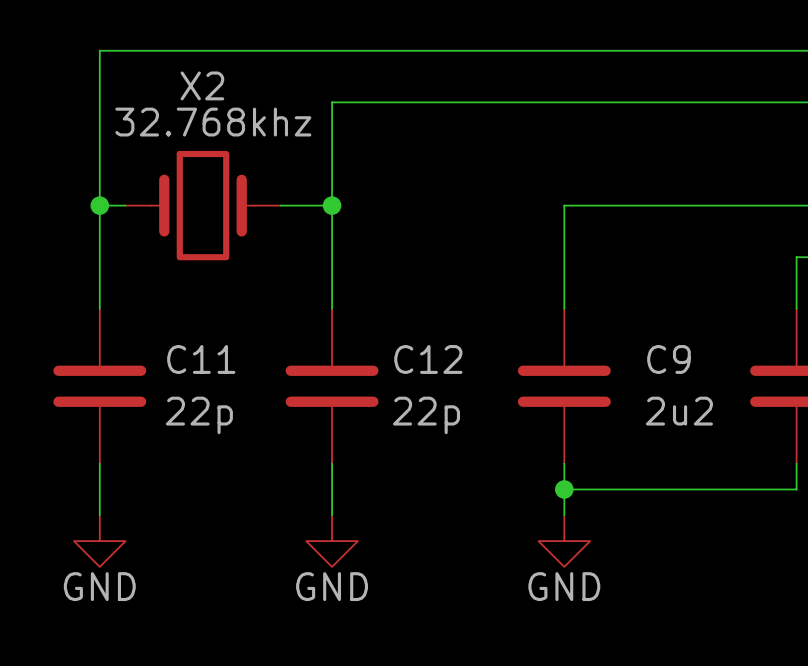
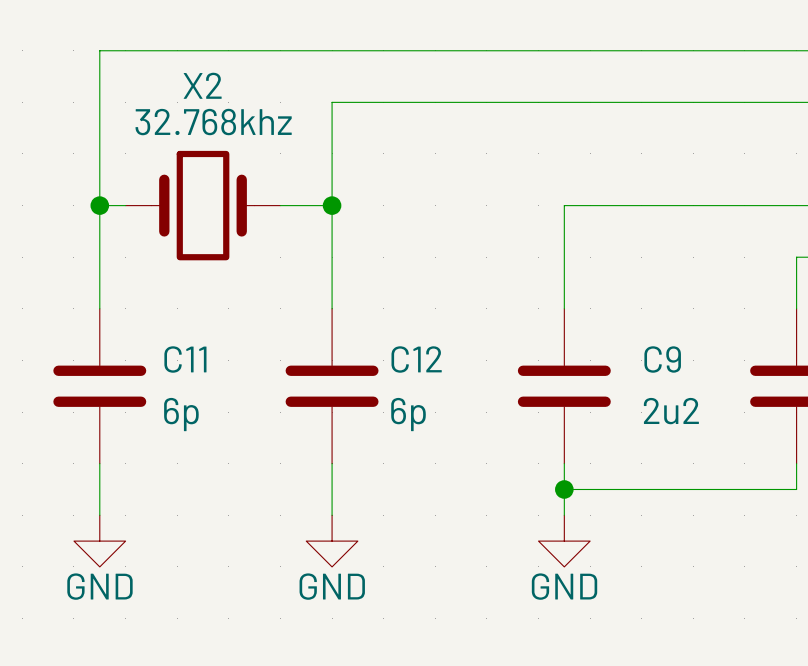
C11 value: 22p (199, 415) -> 6p (181, 414)
C12 value: 22p (426, 415) -> 6p (408, 414)

